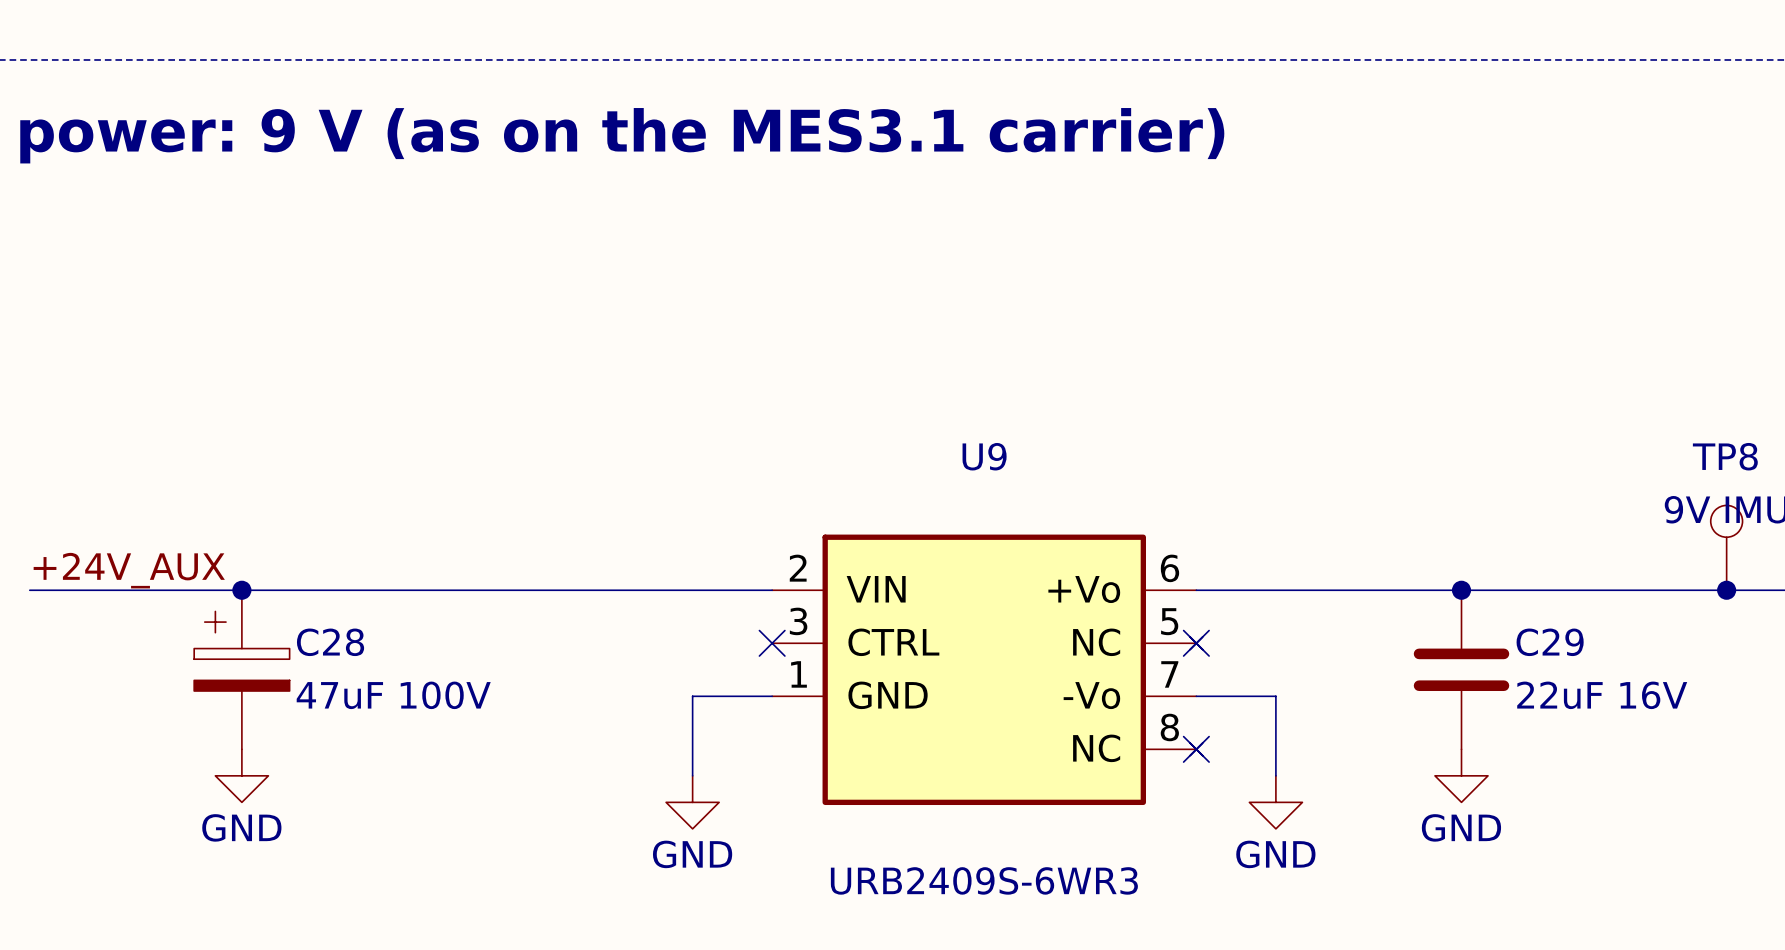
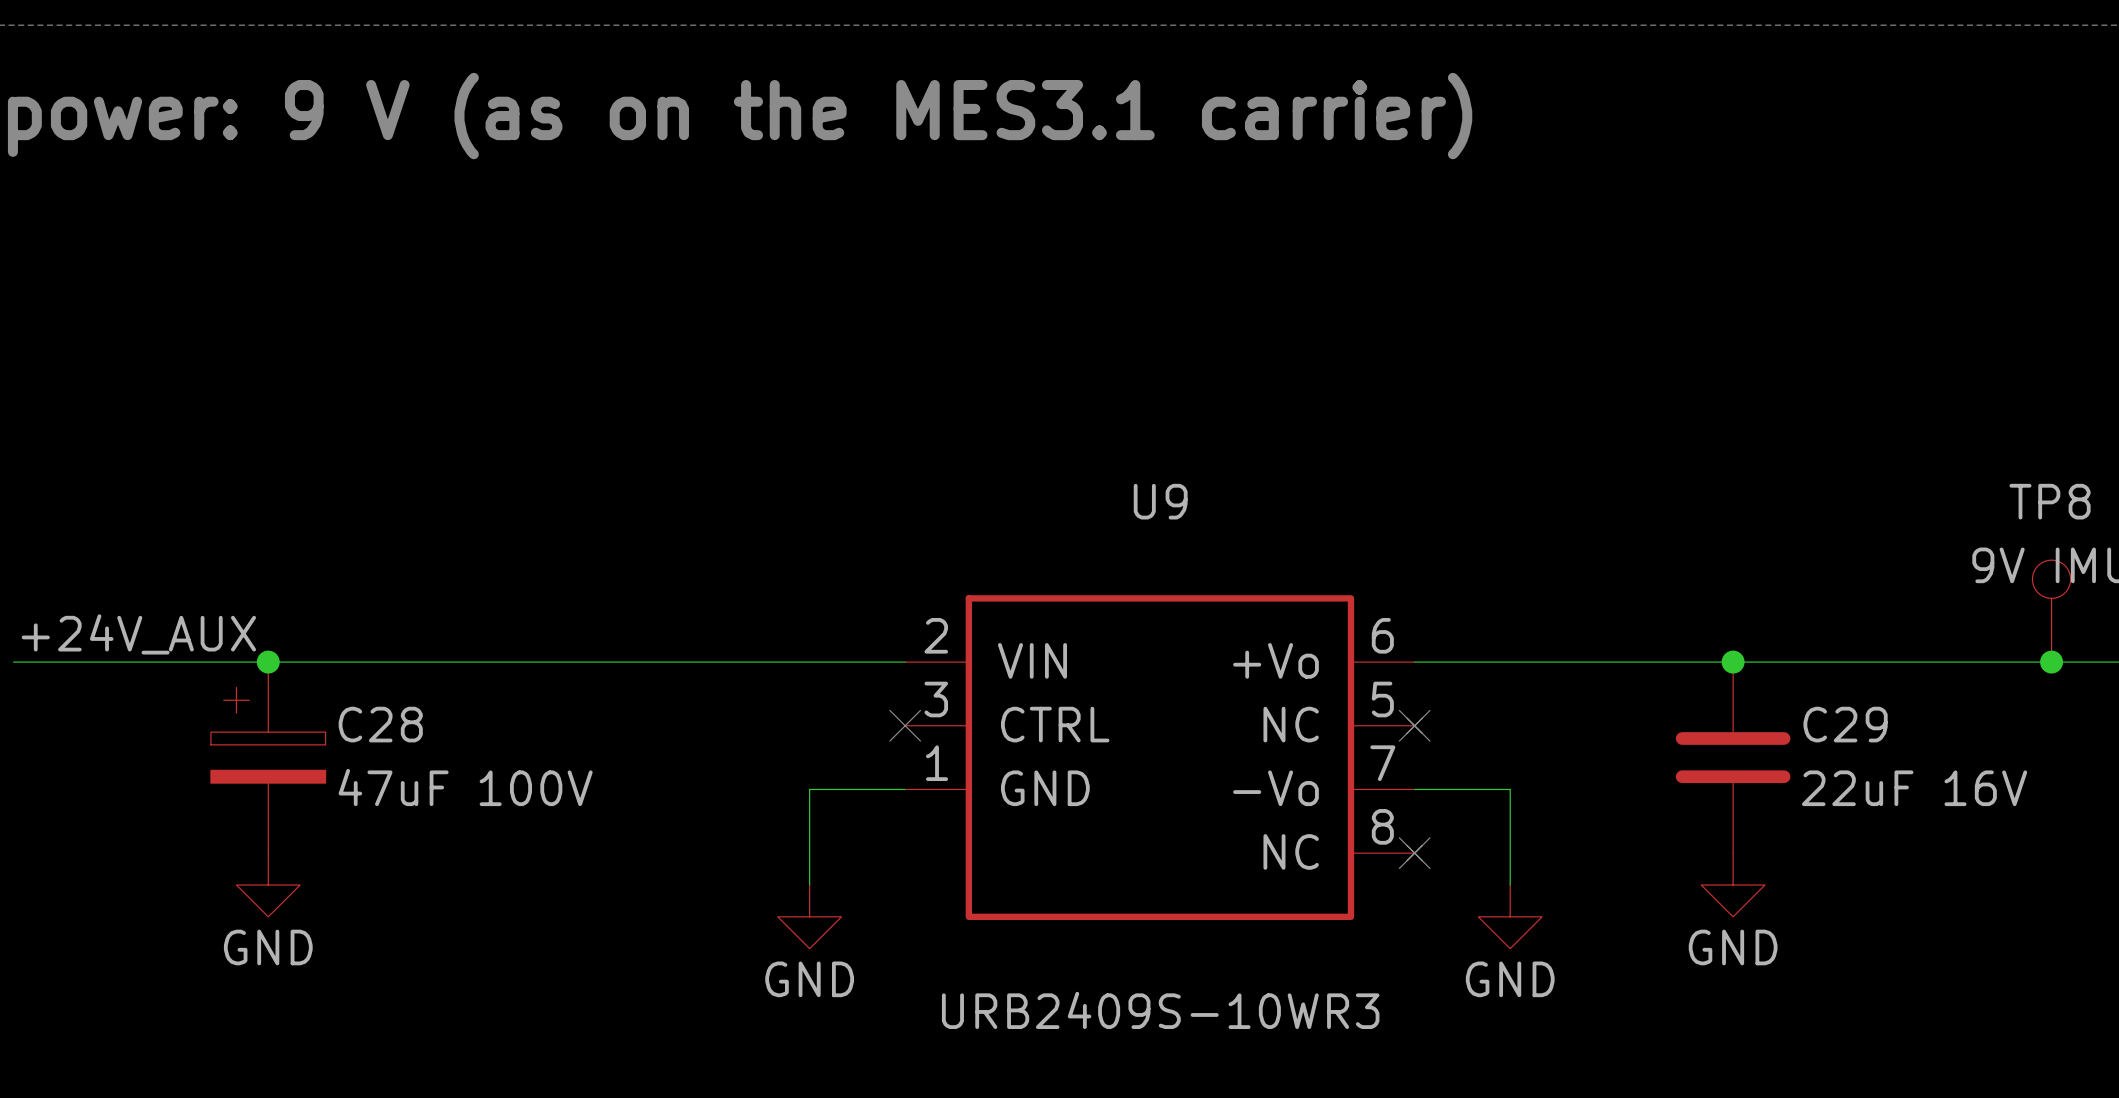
U9 value: URB2409S-6WR3 (984, 880) -> URB2409S-10WR3 (1160, 1010)

